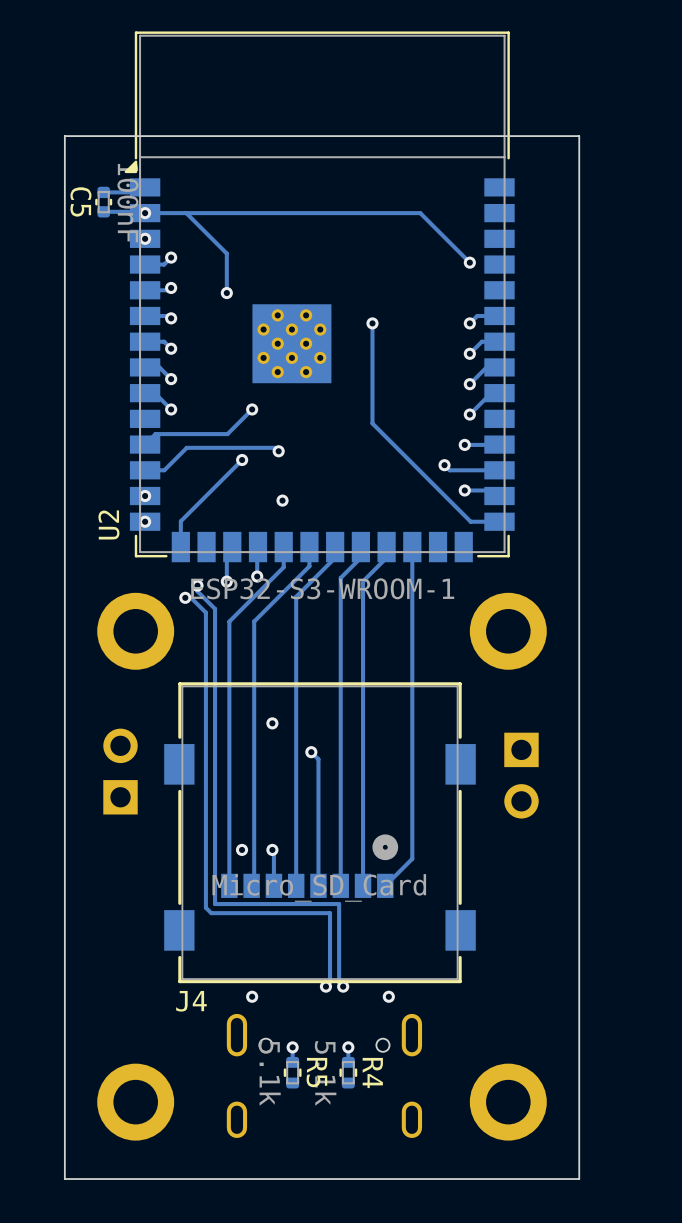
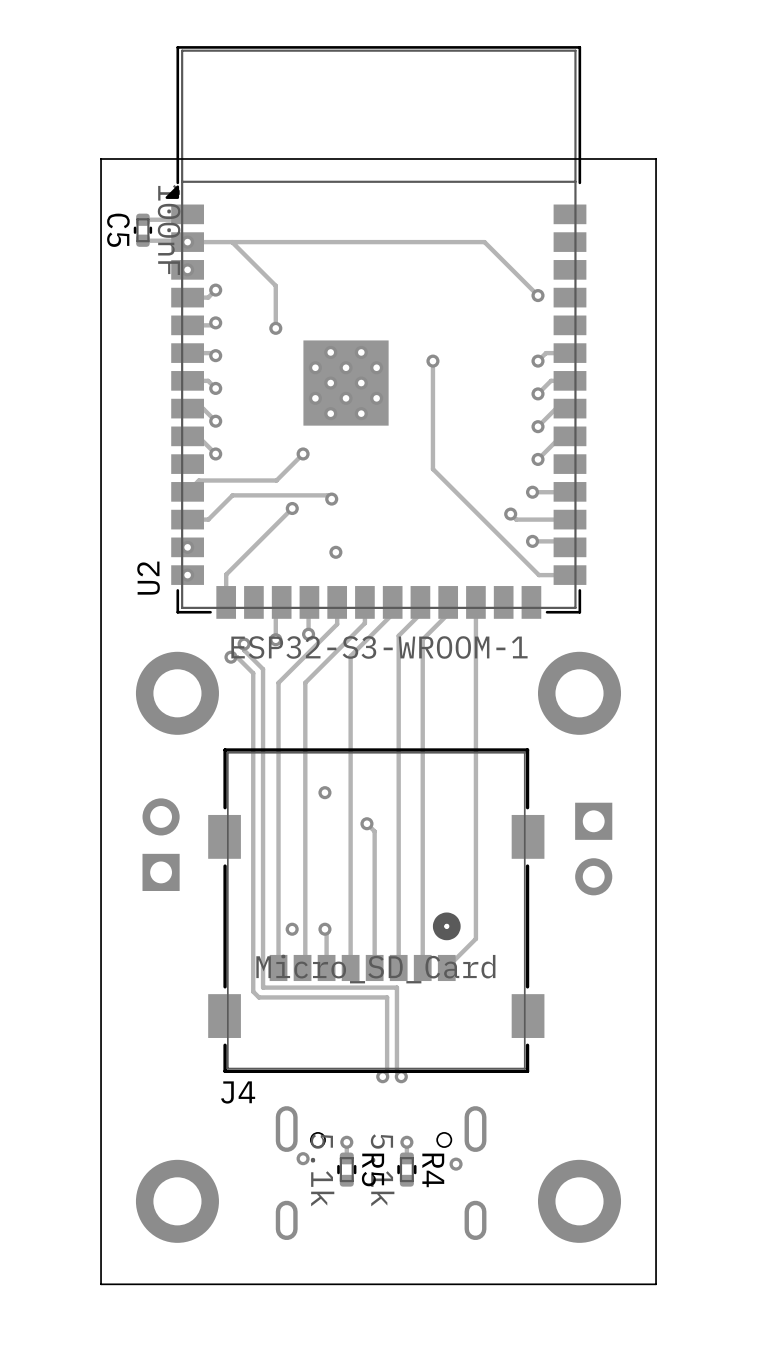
via position: (252, 996) -> (303, 1158)
via position: (388, 996) -> (456, 1164)

